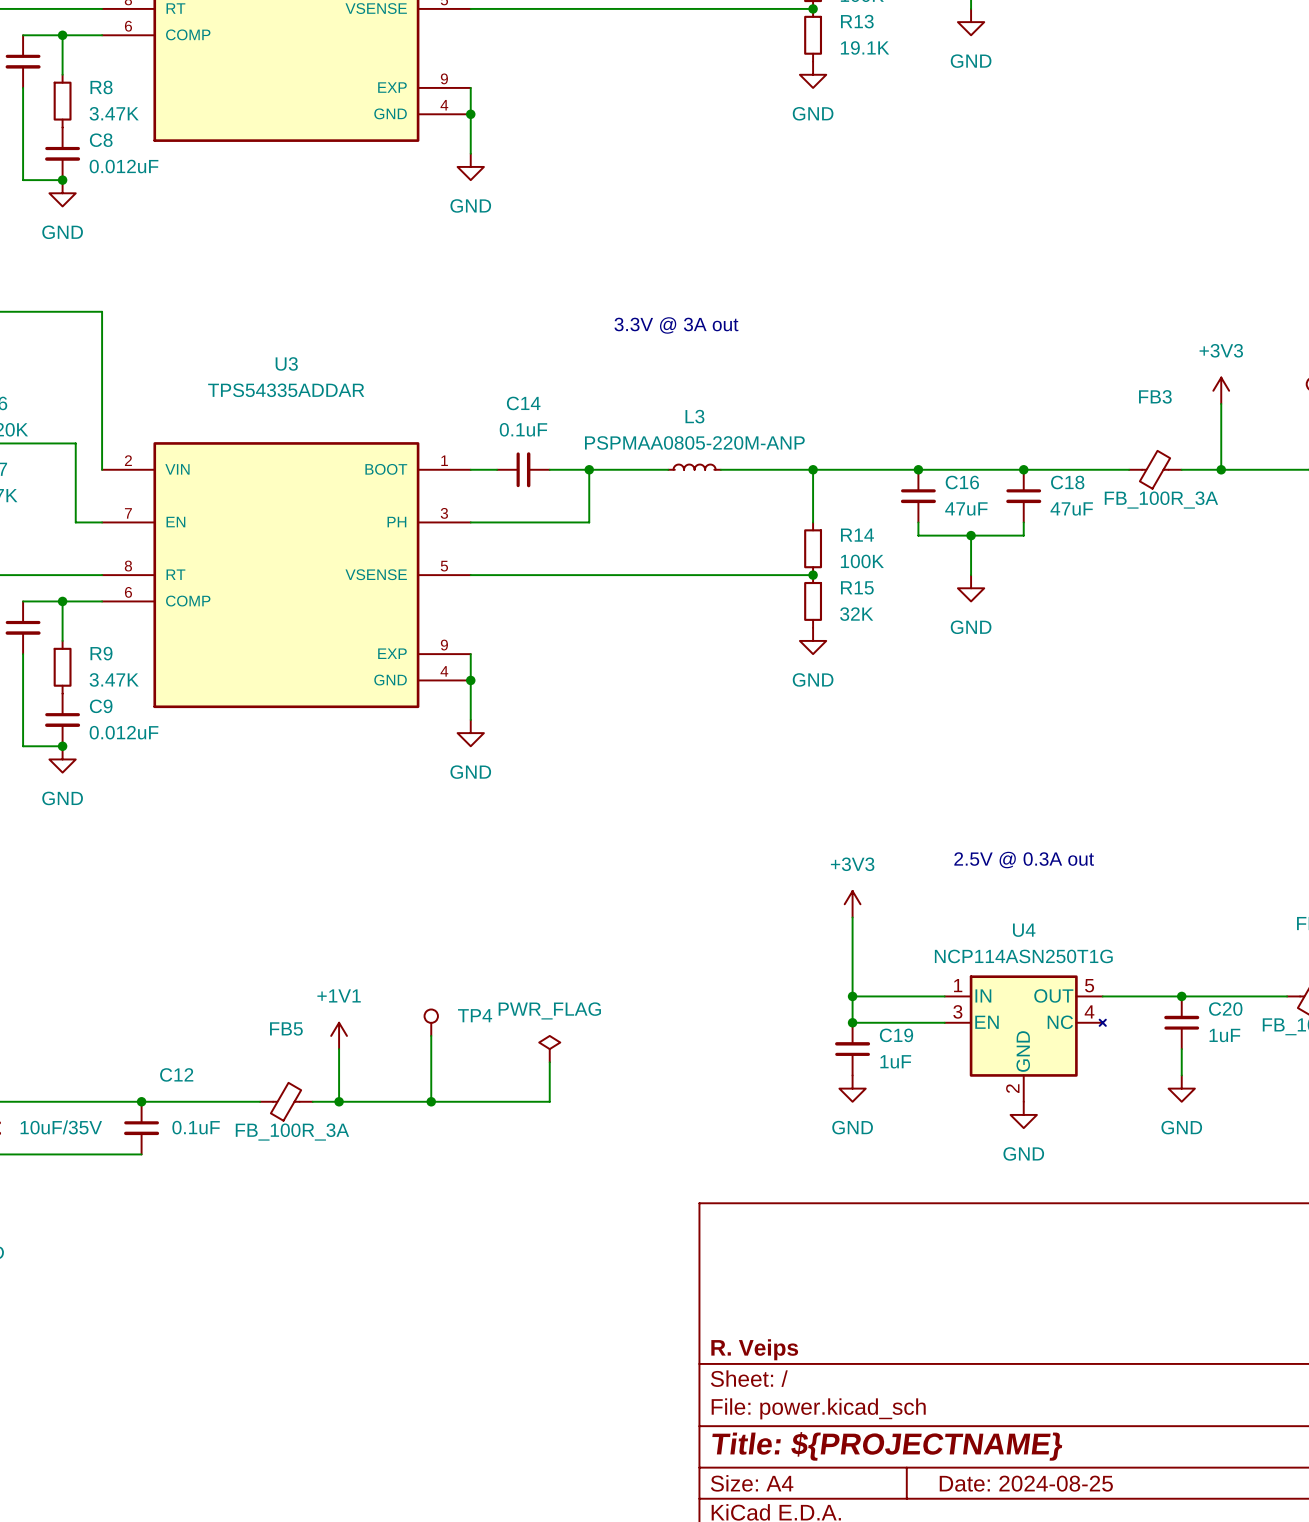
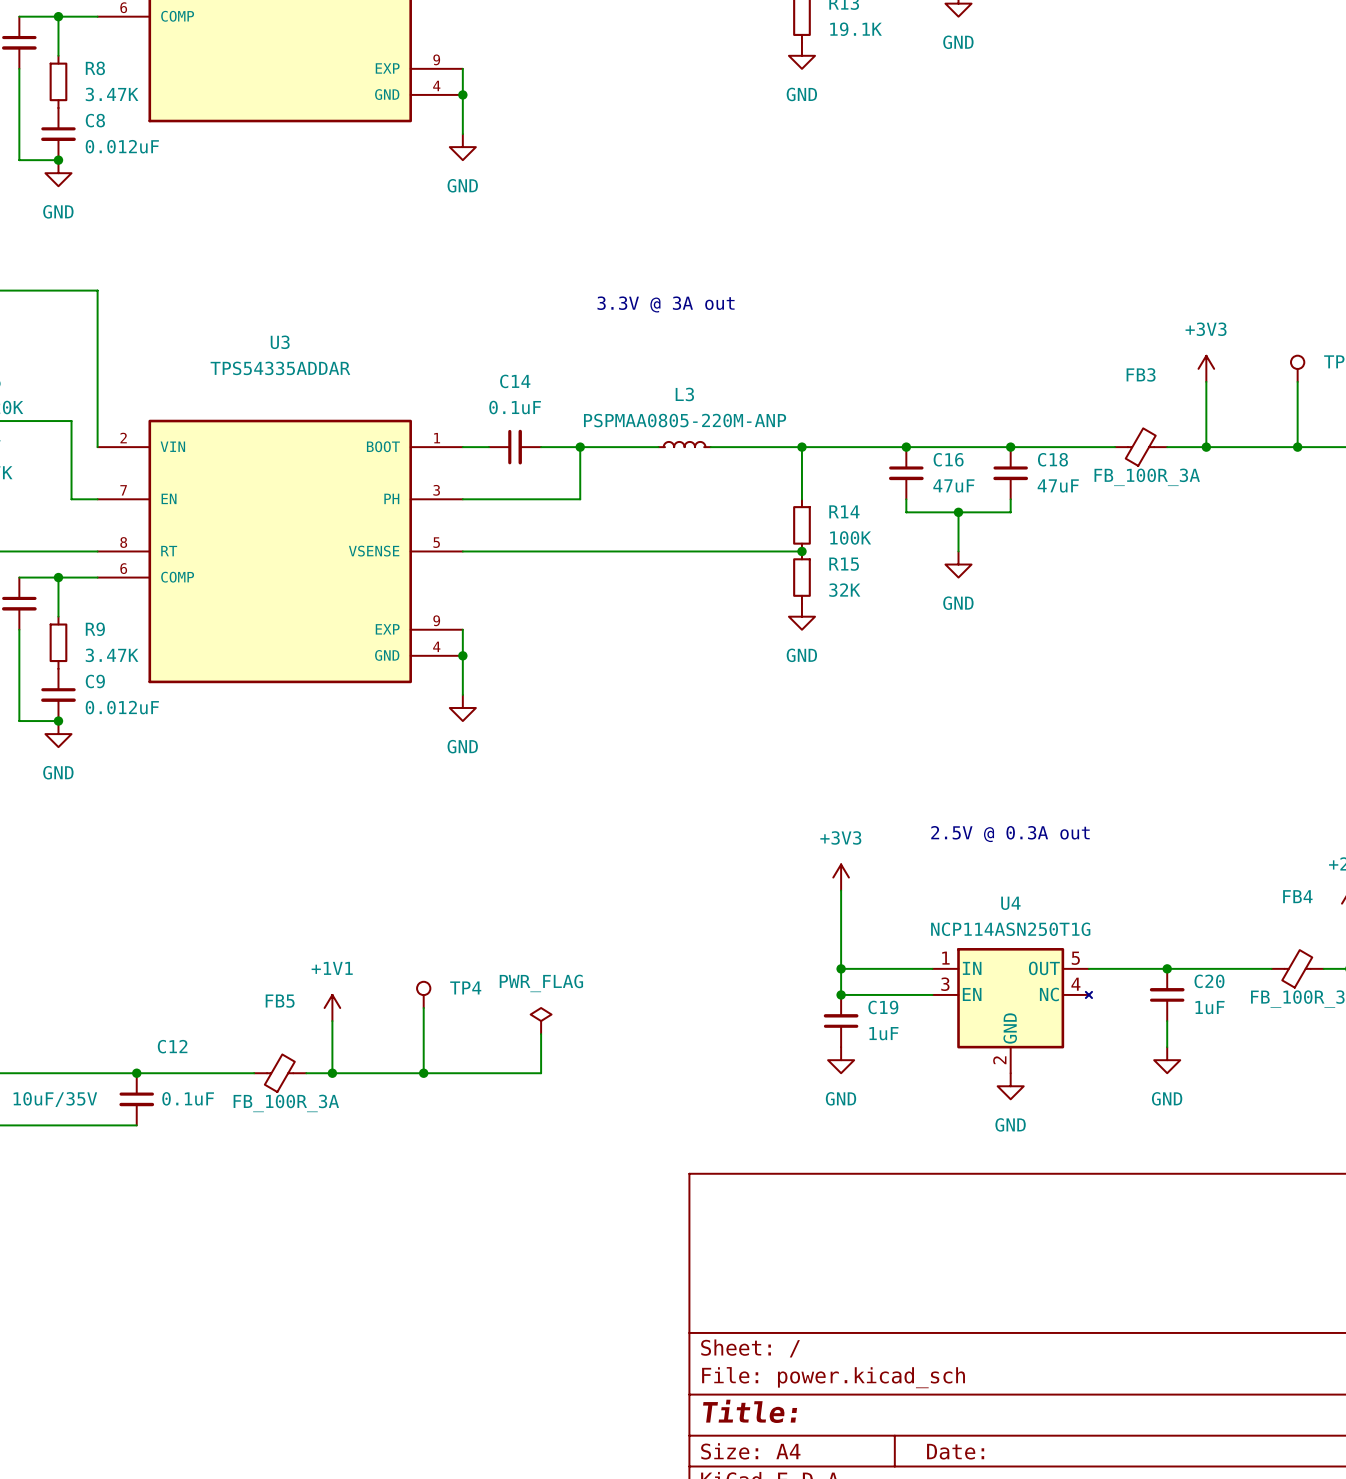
title block: R. Veips (754, 1349) -> none
title block: Title: ${PROJECTNAME} (887, 1446) -> Title: (750, 1411)
title block: Date: 2024-08-25 (1026, 1483) -> Date: (955, 1451)

